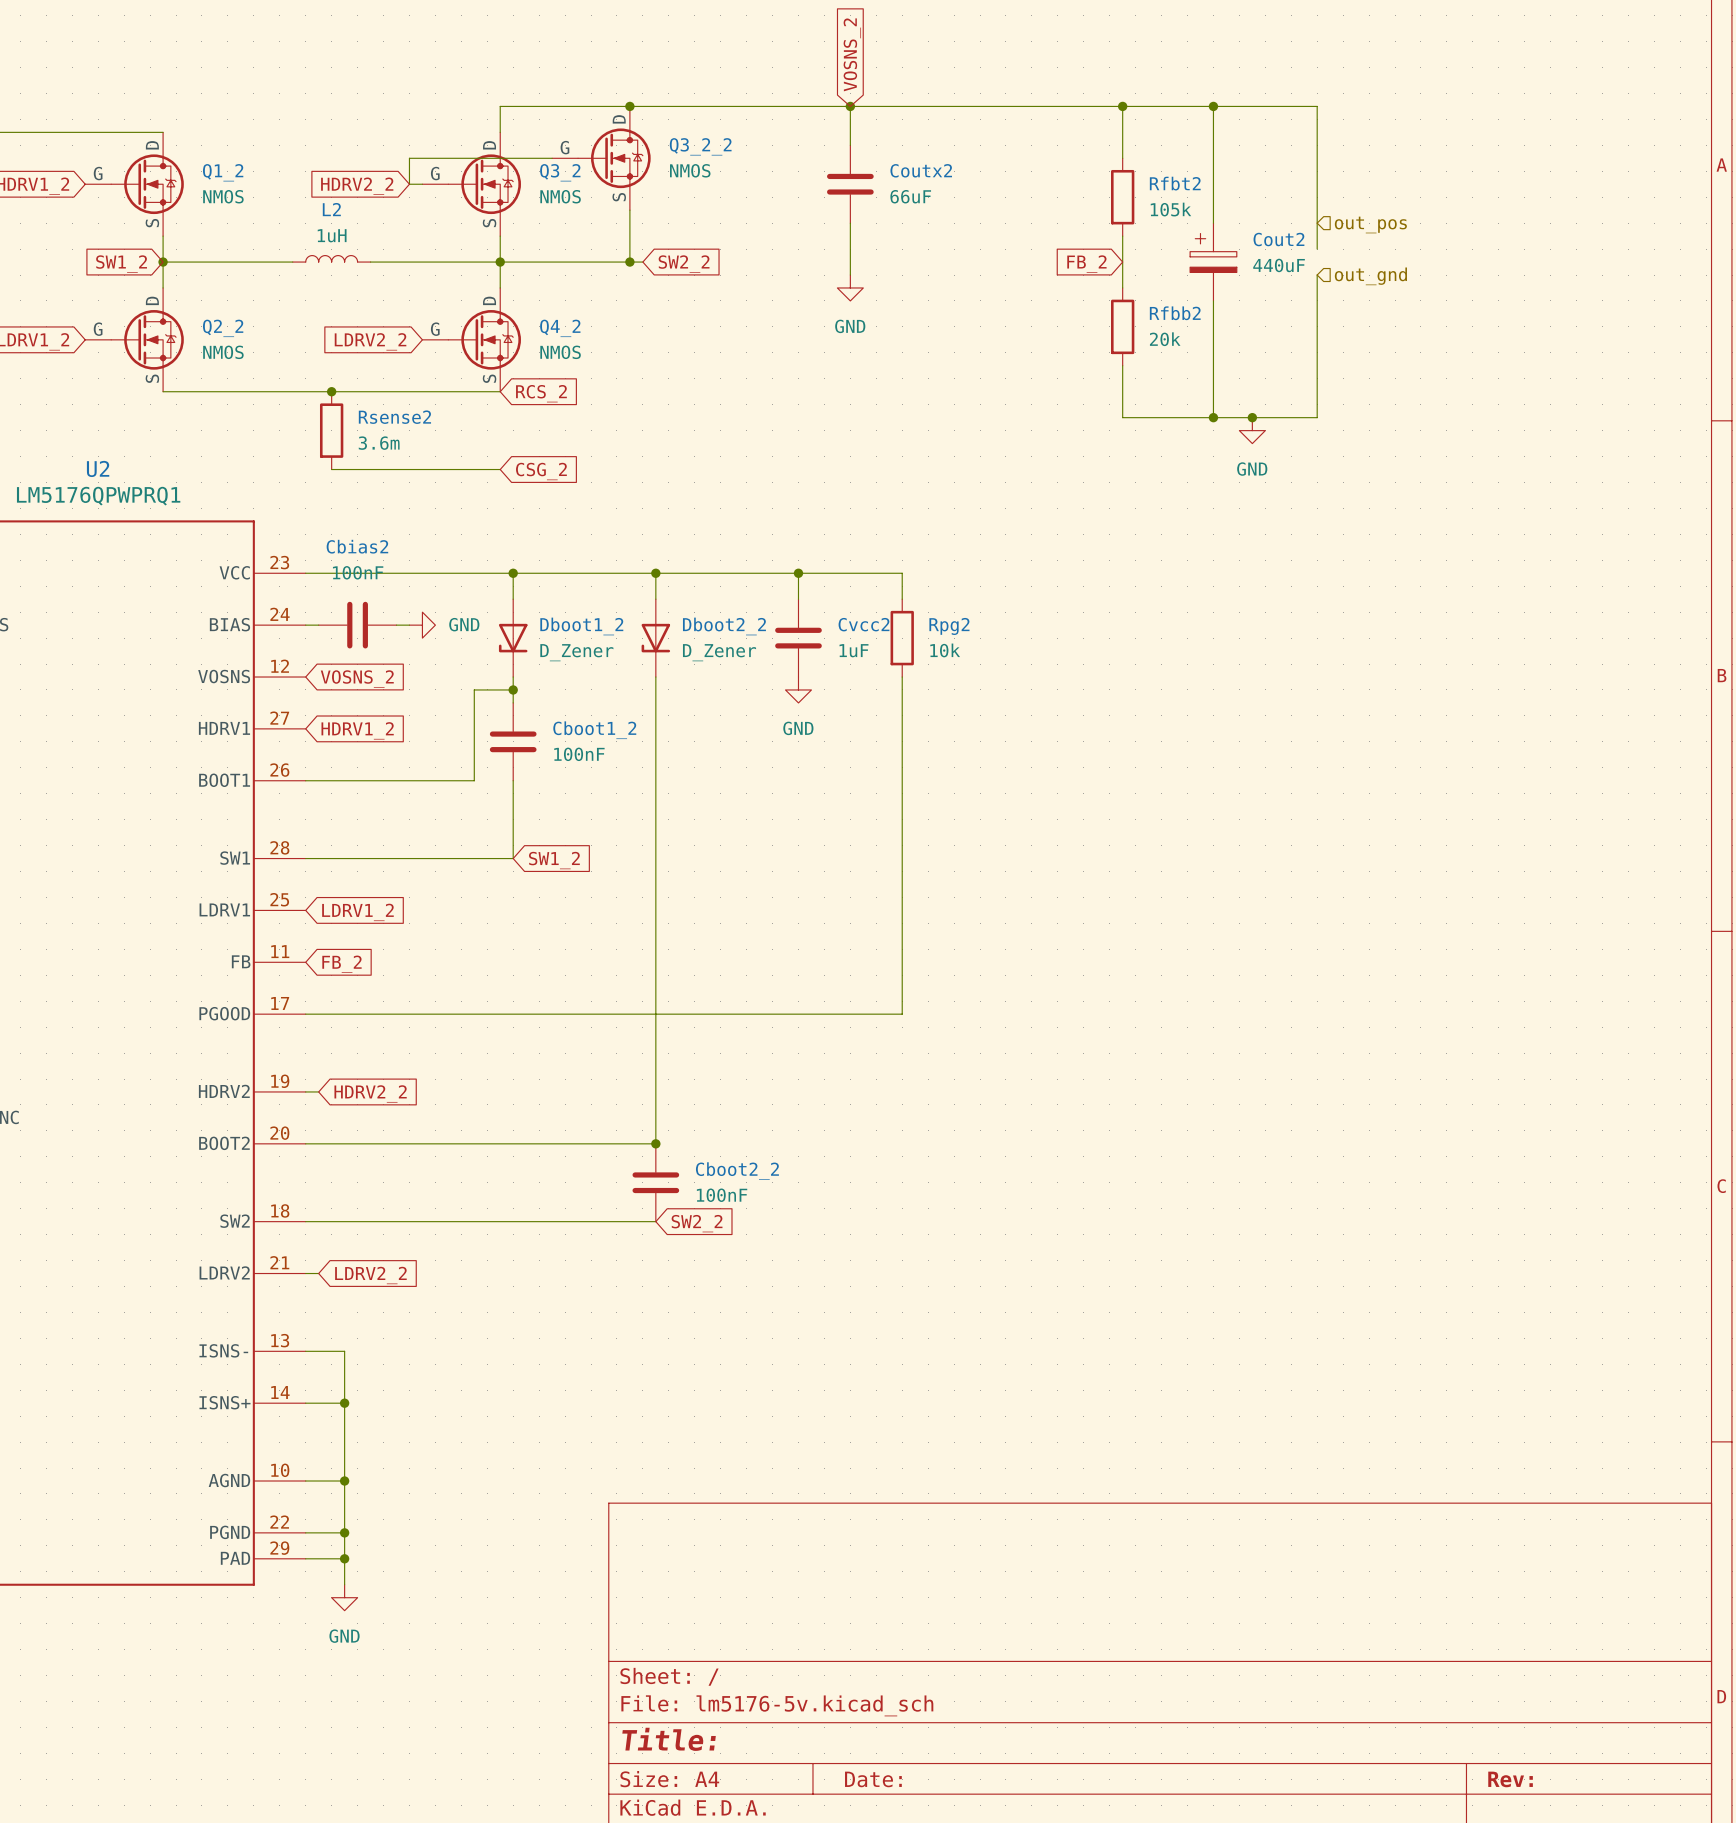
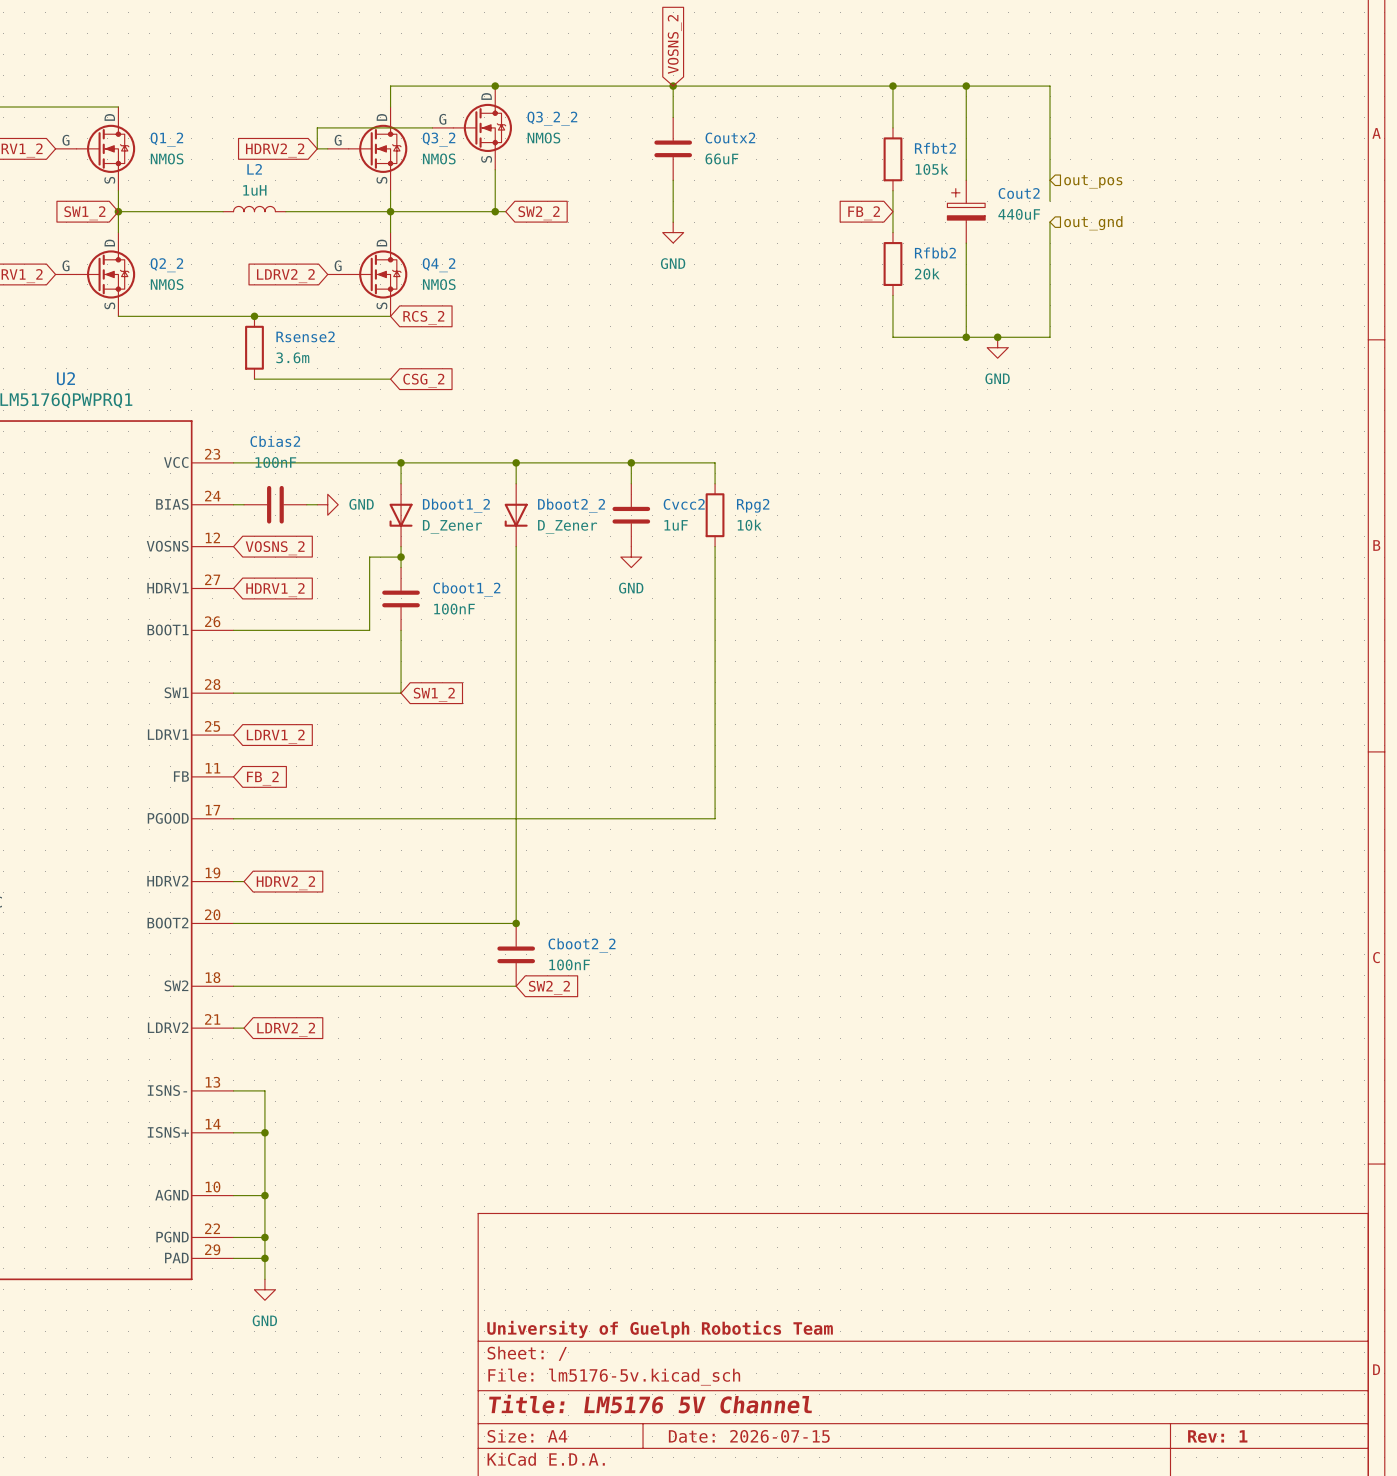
title block: none -> University of Guelph Robotics Team (660, 1329)
title block: Title: (669, 1739) -> Title: LM5176 5V Channel (650, 1404)
title block: Date: (873, 1779) -> Date: 2026-07-15 (749, 1436)
title block: Rev: (1510, 1779) -> Rev: 1 (1217, 1436)

